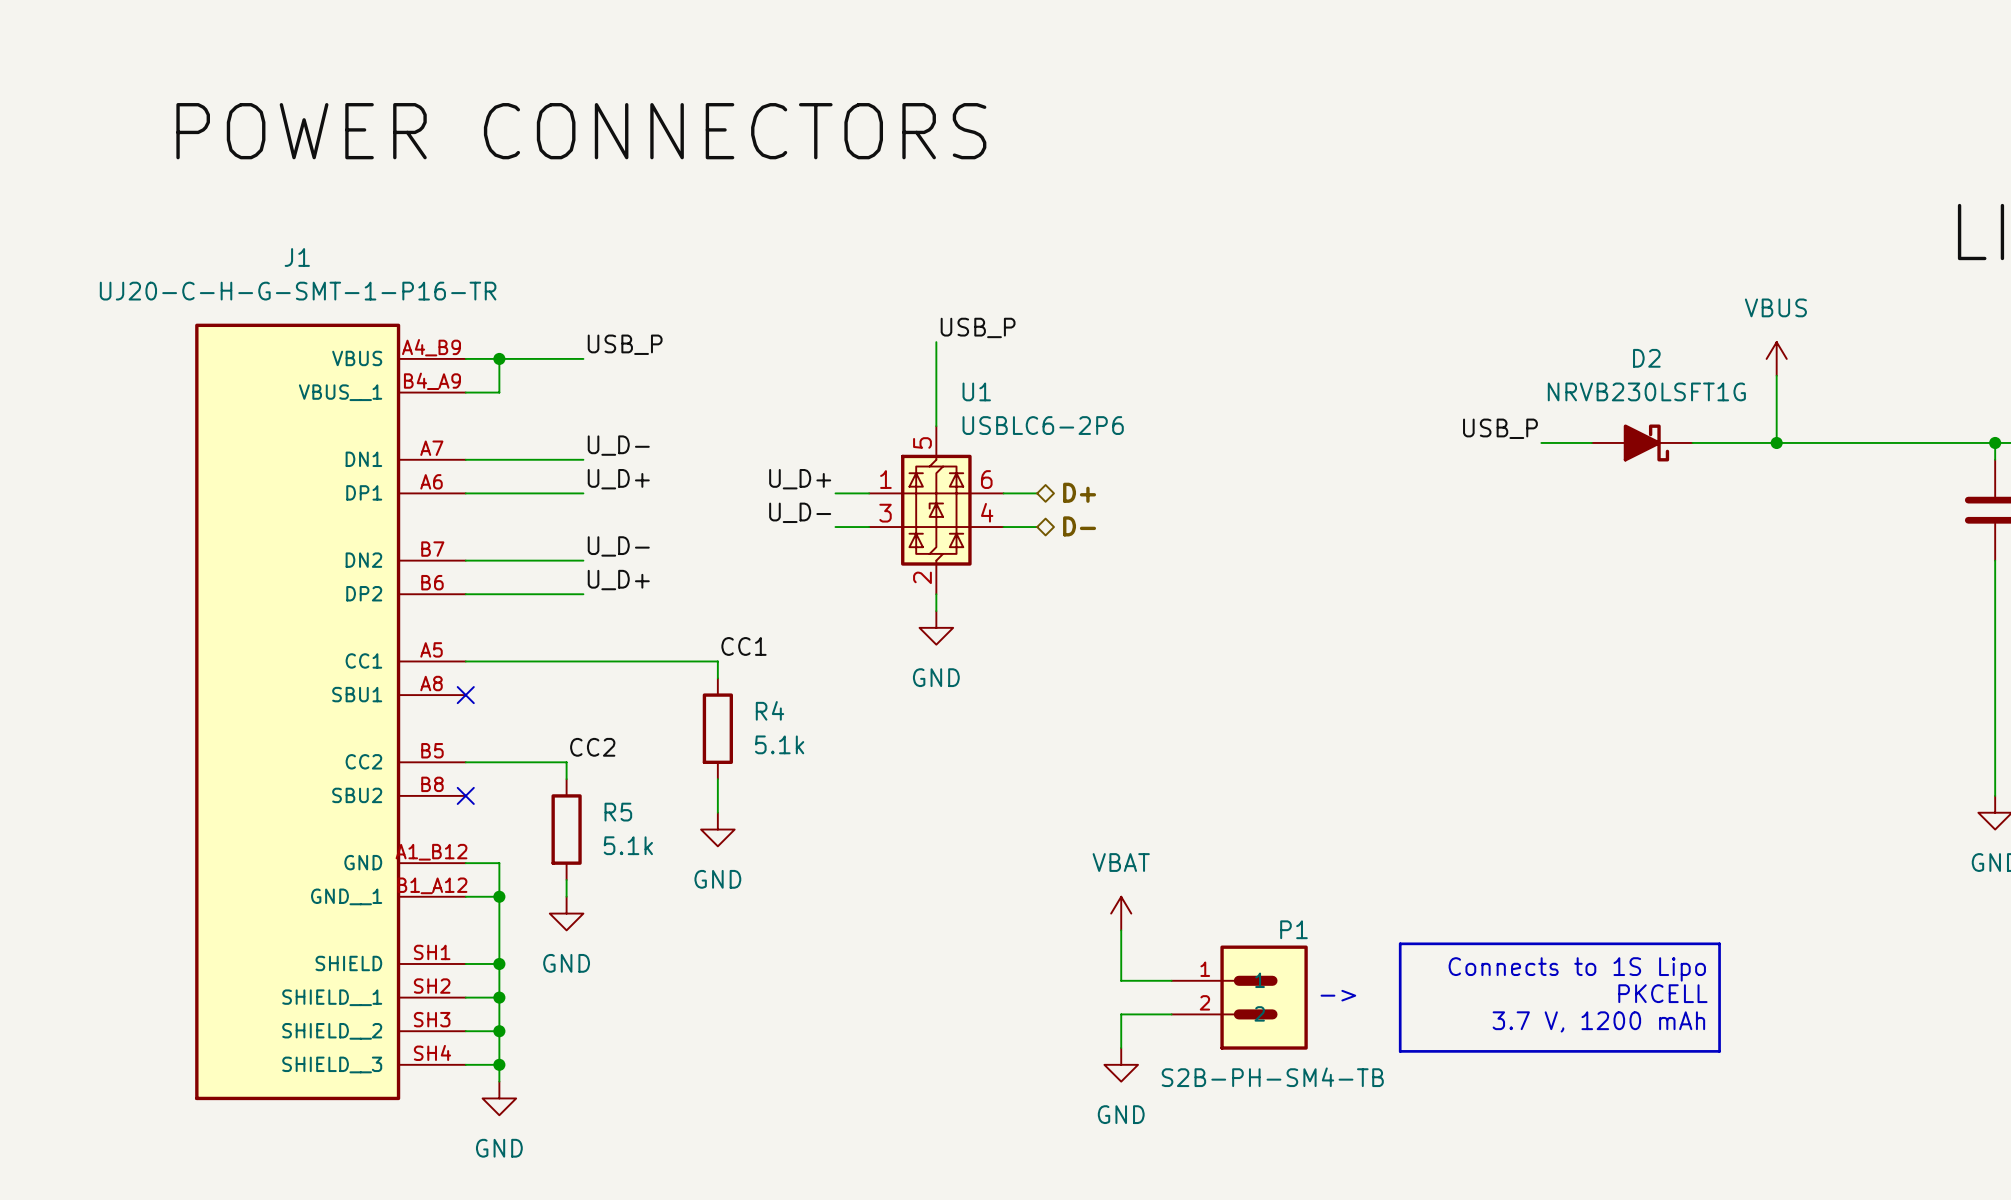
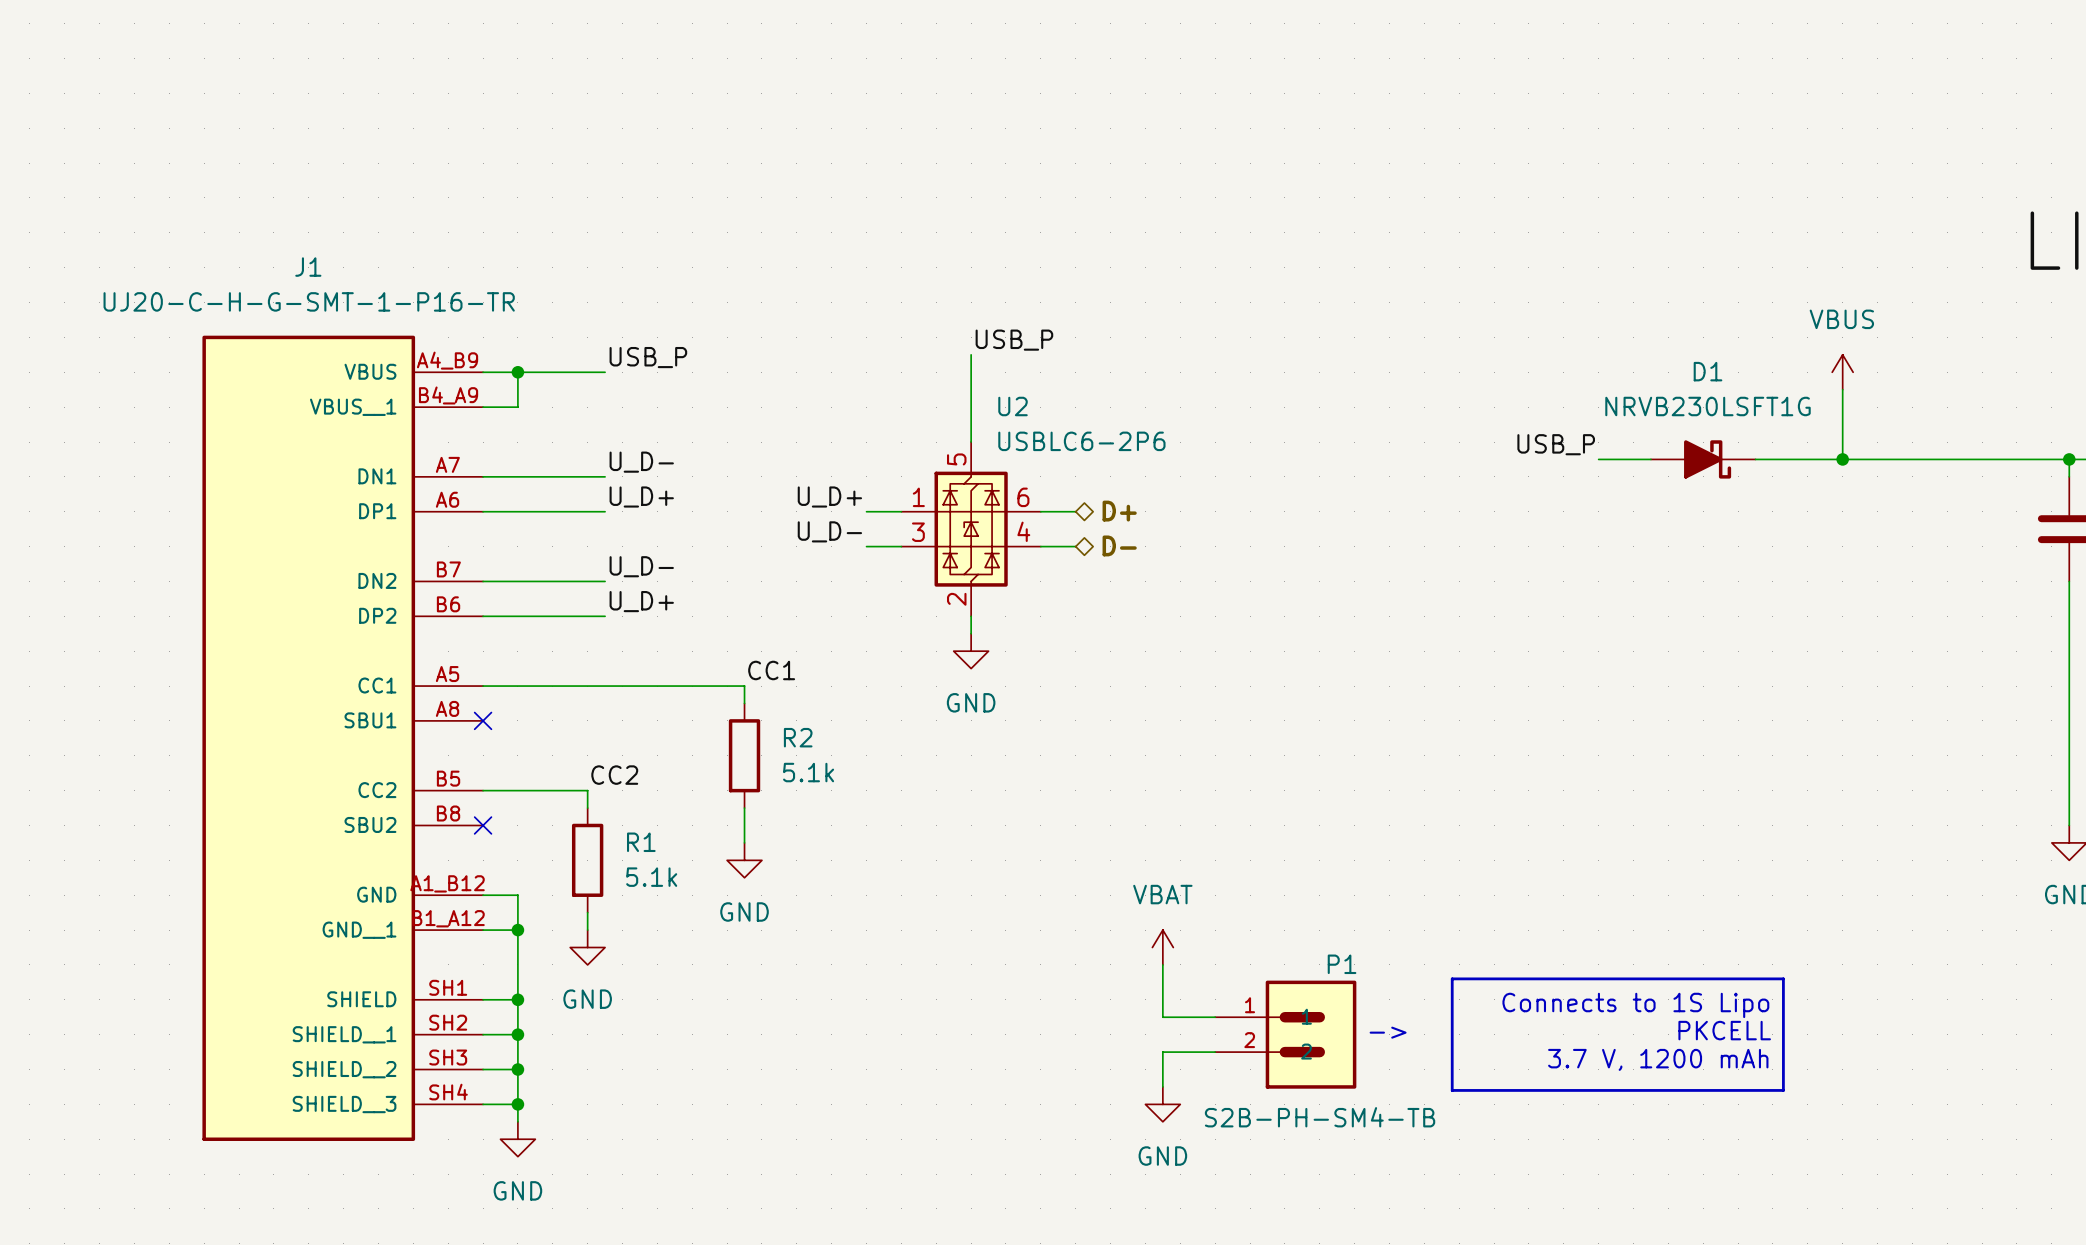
label: POWER CONNECTORS (581, 131) -> none
D2 name: D2 (1646, 358) -> D1 (1708, 371)
U1 name: U1 (976, 391) -> U2 (1013, 406)
R4 name: R4 (770, 710) -> R2 (798, 737)
R5 name: R5 (618, 812) -> R1 (641, 842)

